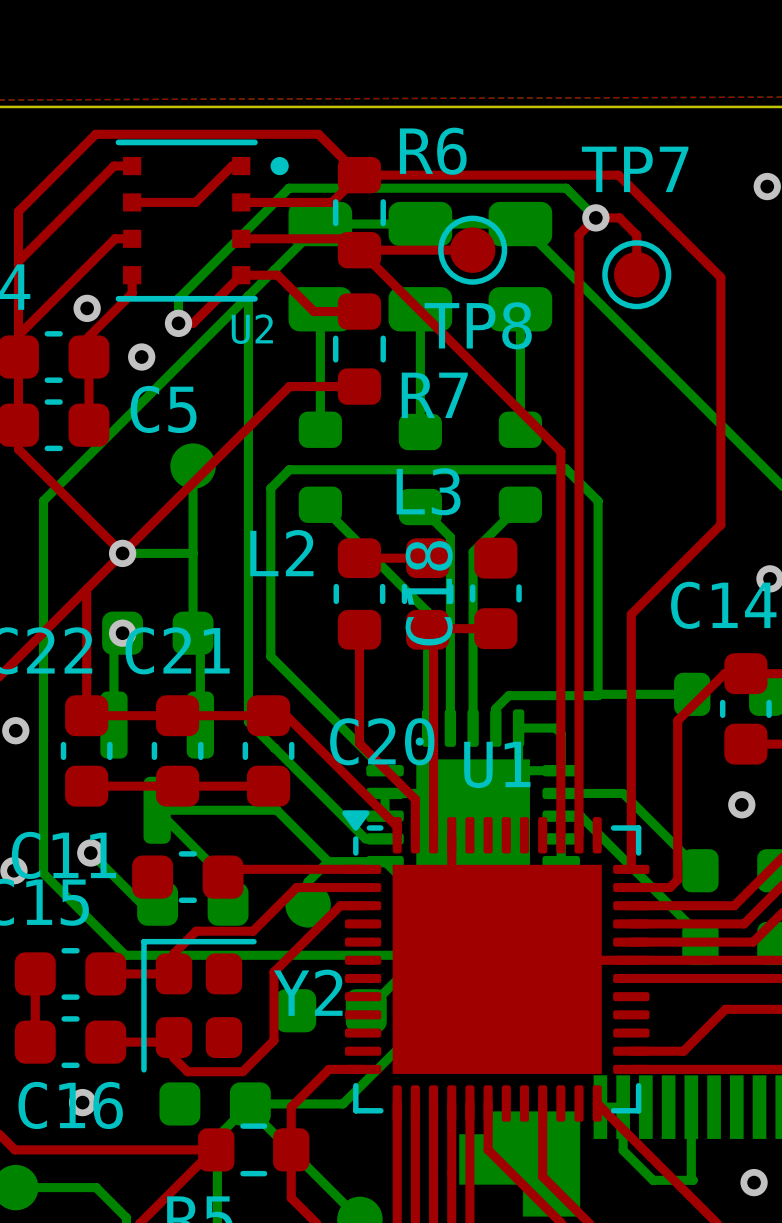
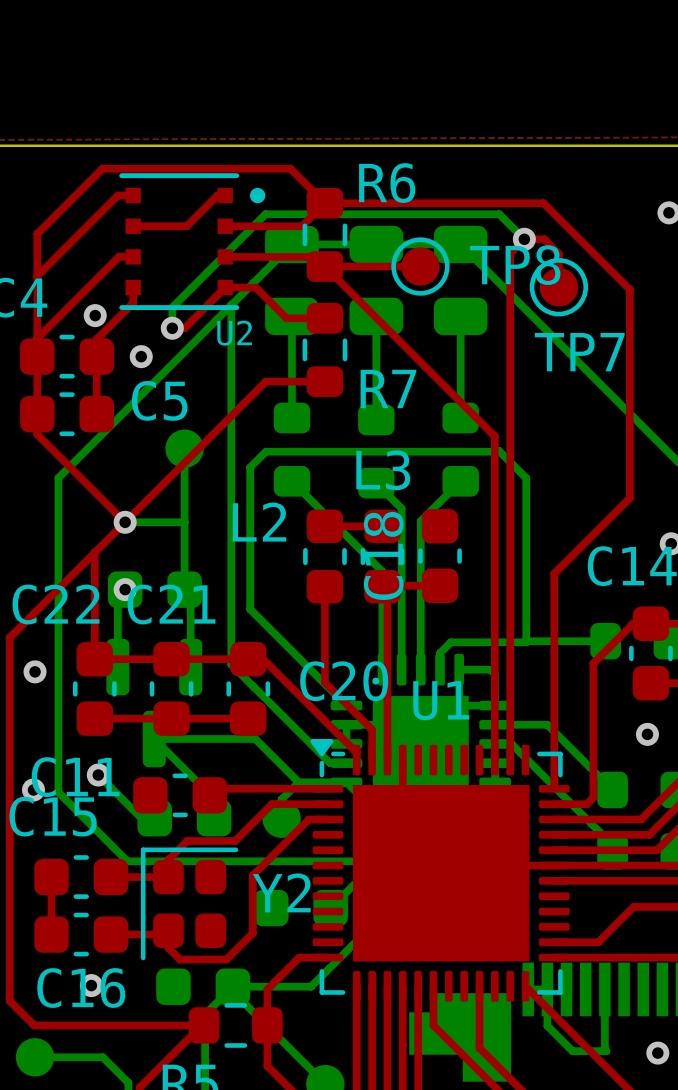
TP7 name position: TP7 (635, 169) -> TP7 (579, 352)
TP8 name position: TP8 (478, 325) -> TP8 (515, 265)

